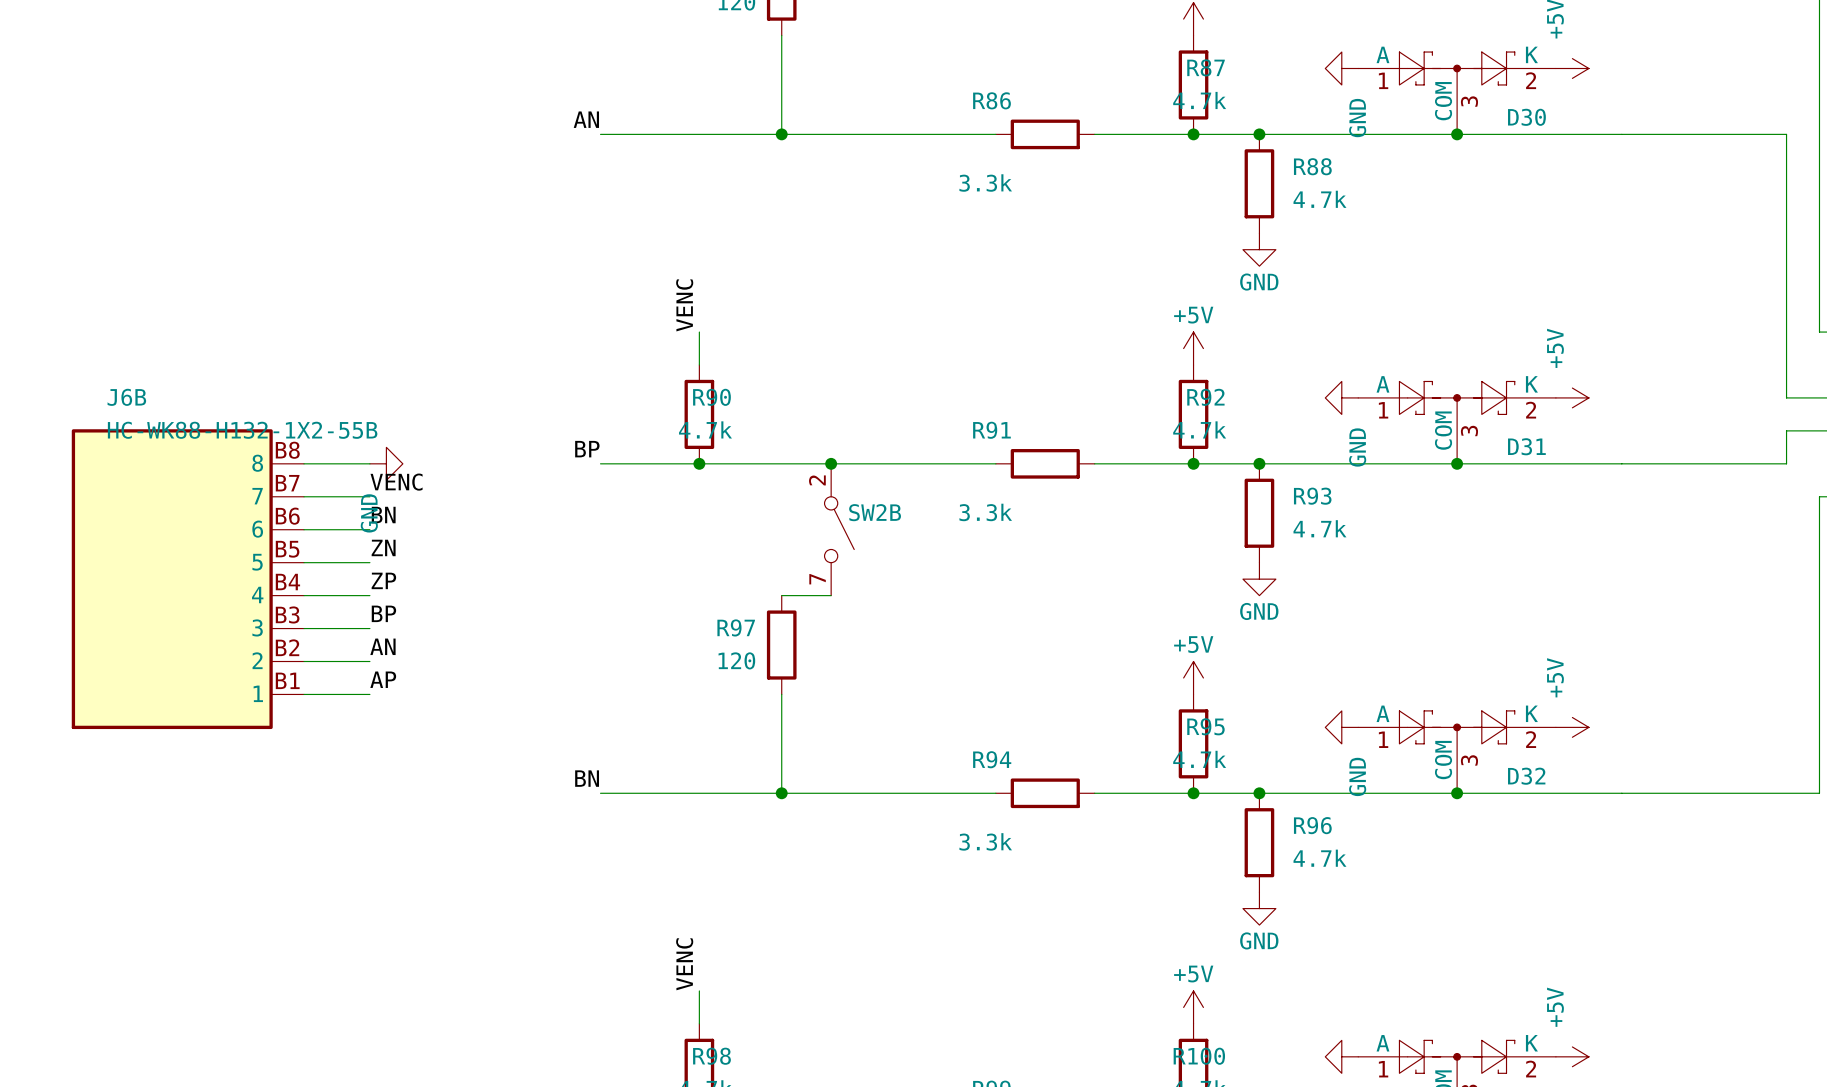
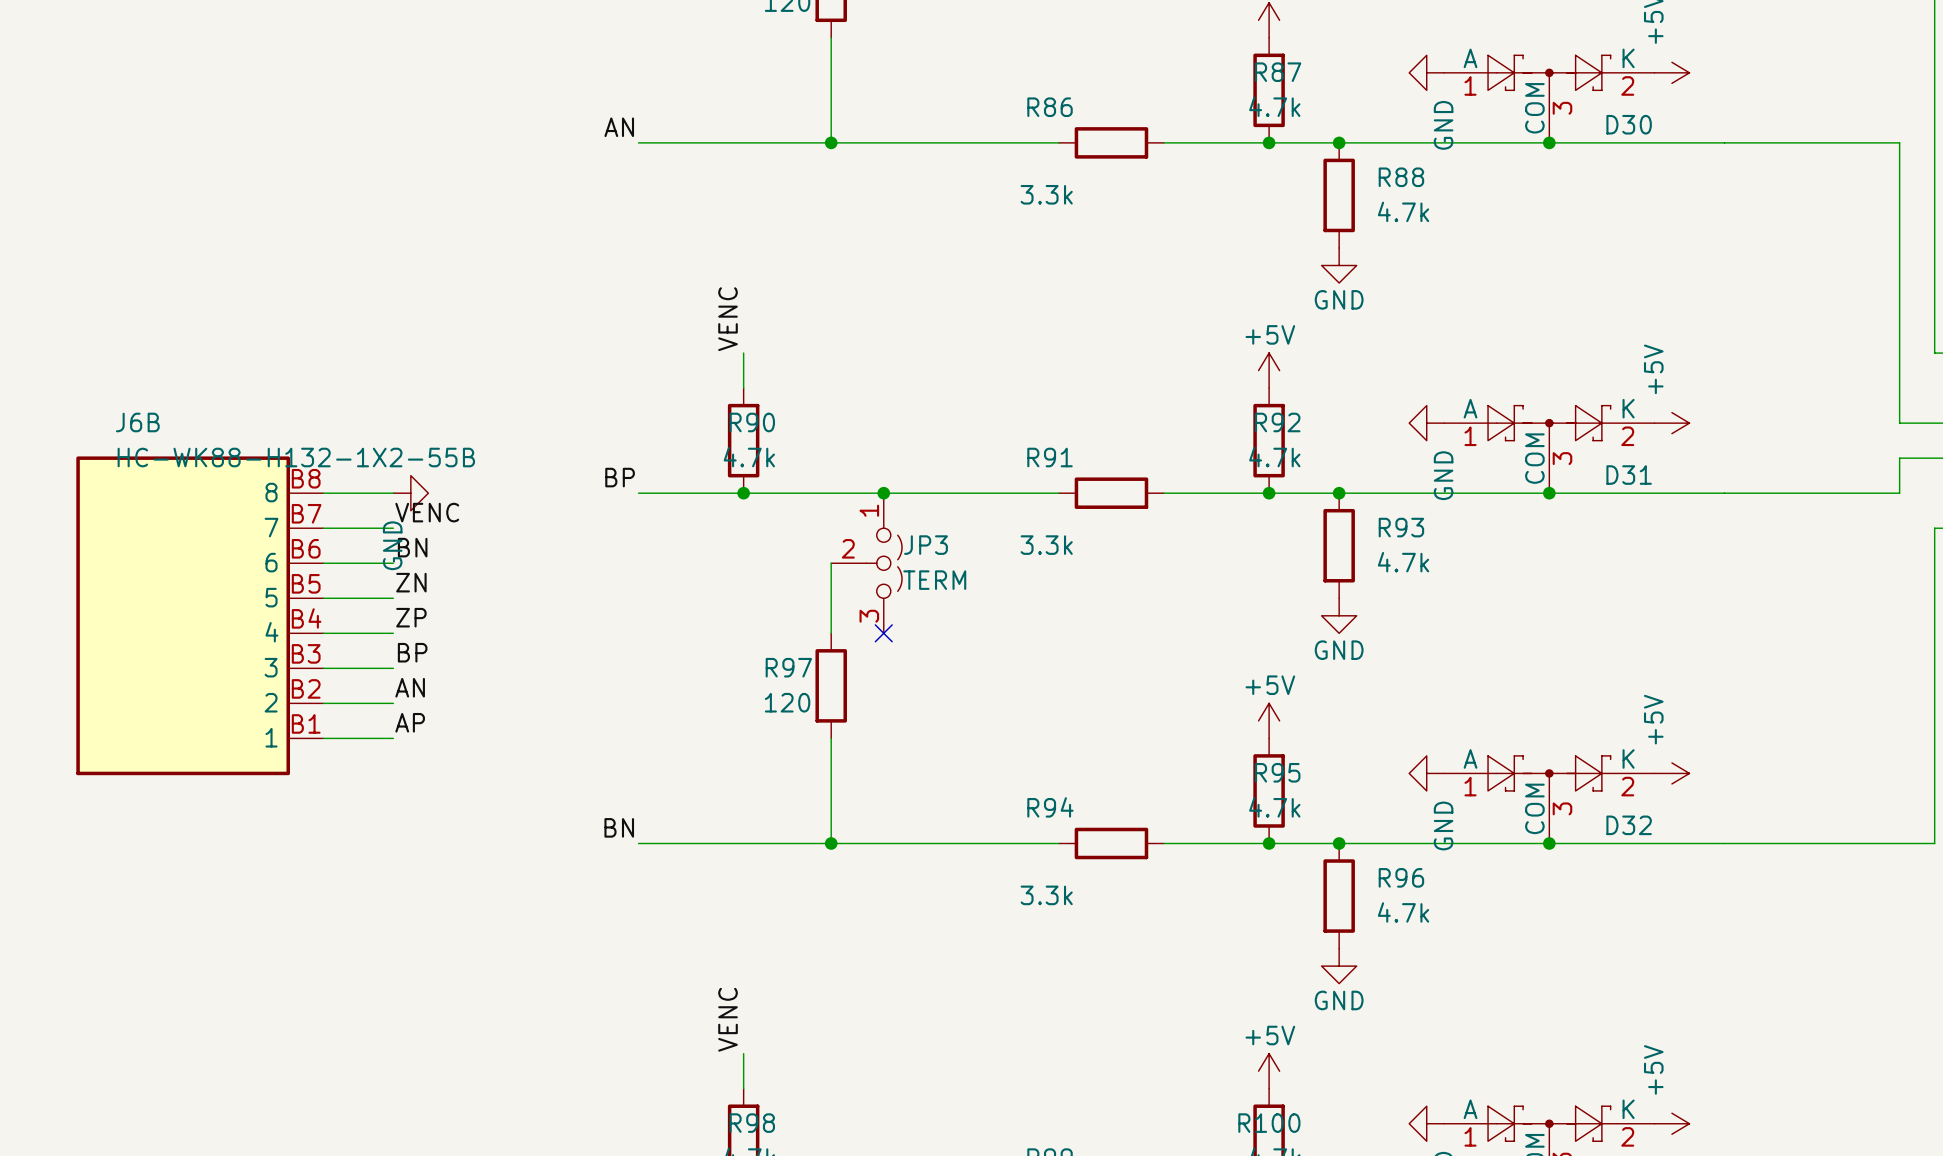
JP3: none -> TERM (866, 563)
SW2B: (839, 529) -> none
wire: (781, 595) (831, 595) -> (831, 633) (831, 563)
no-connect mark: none -> (883, 633)

